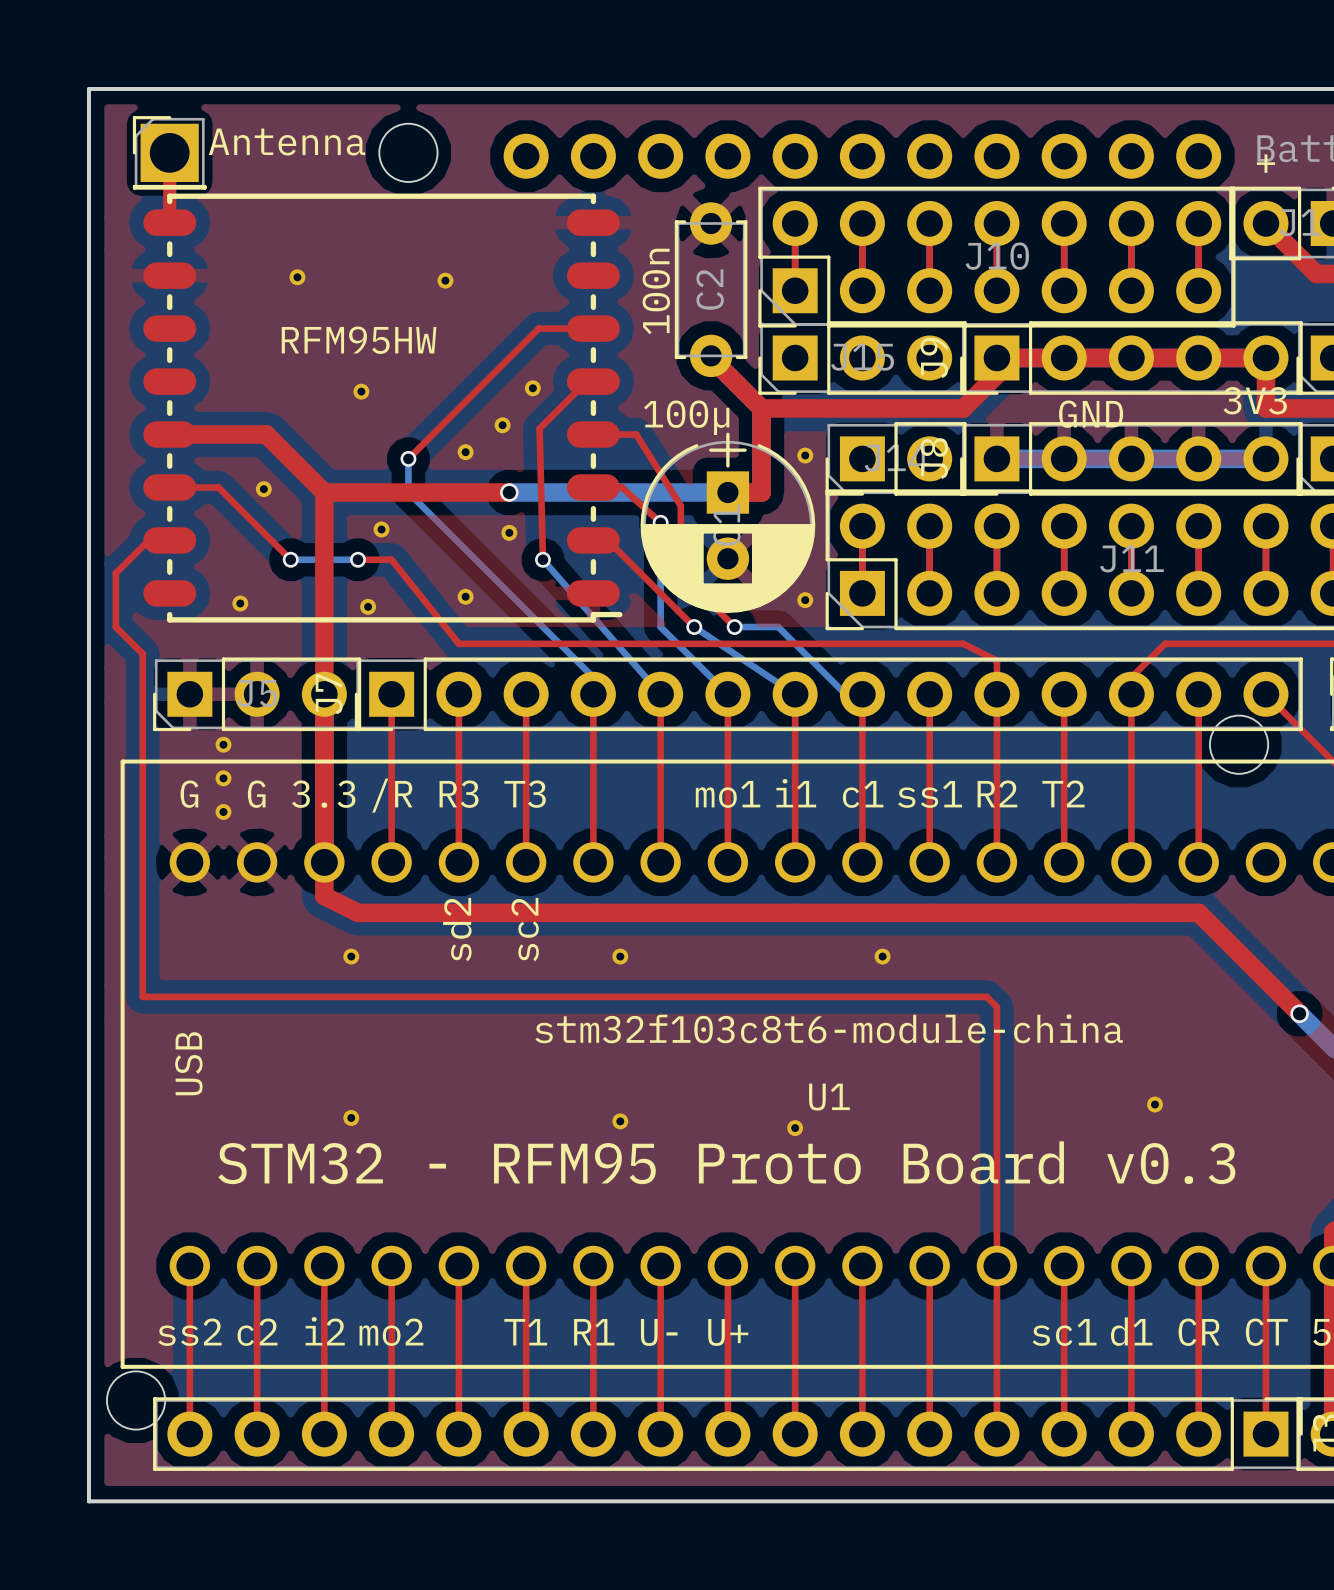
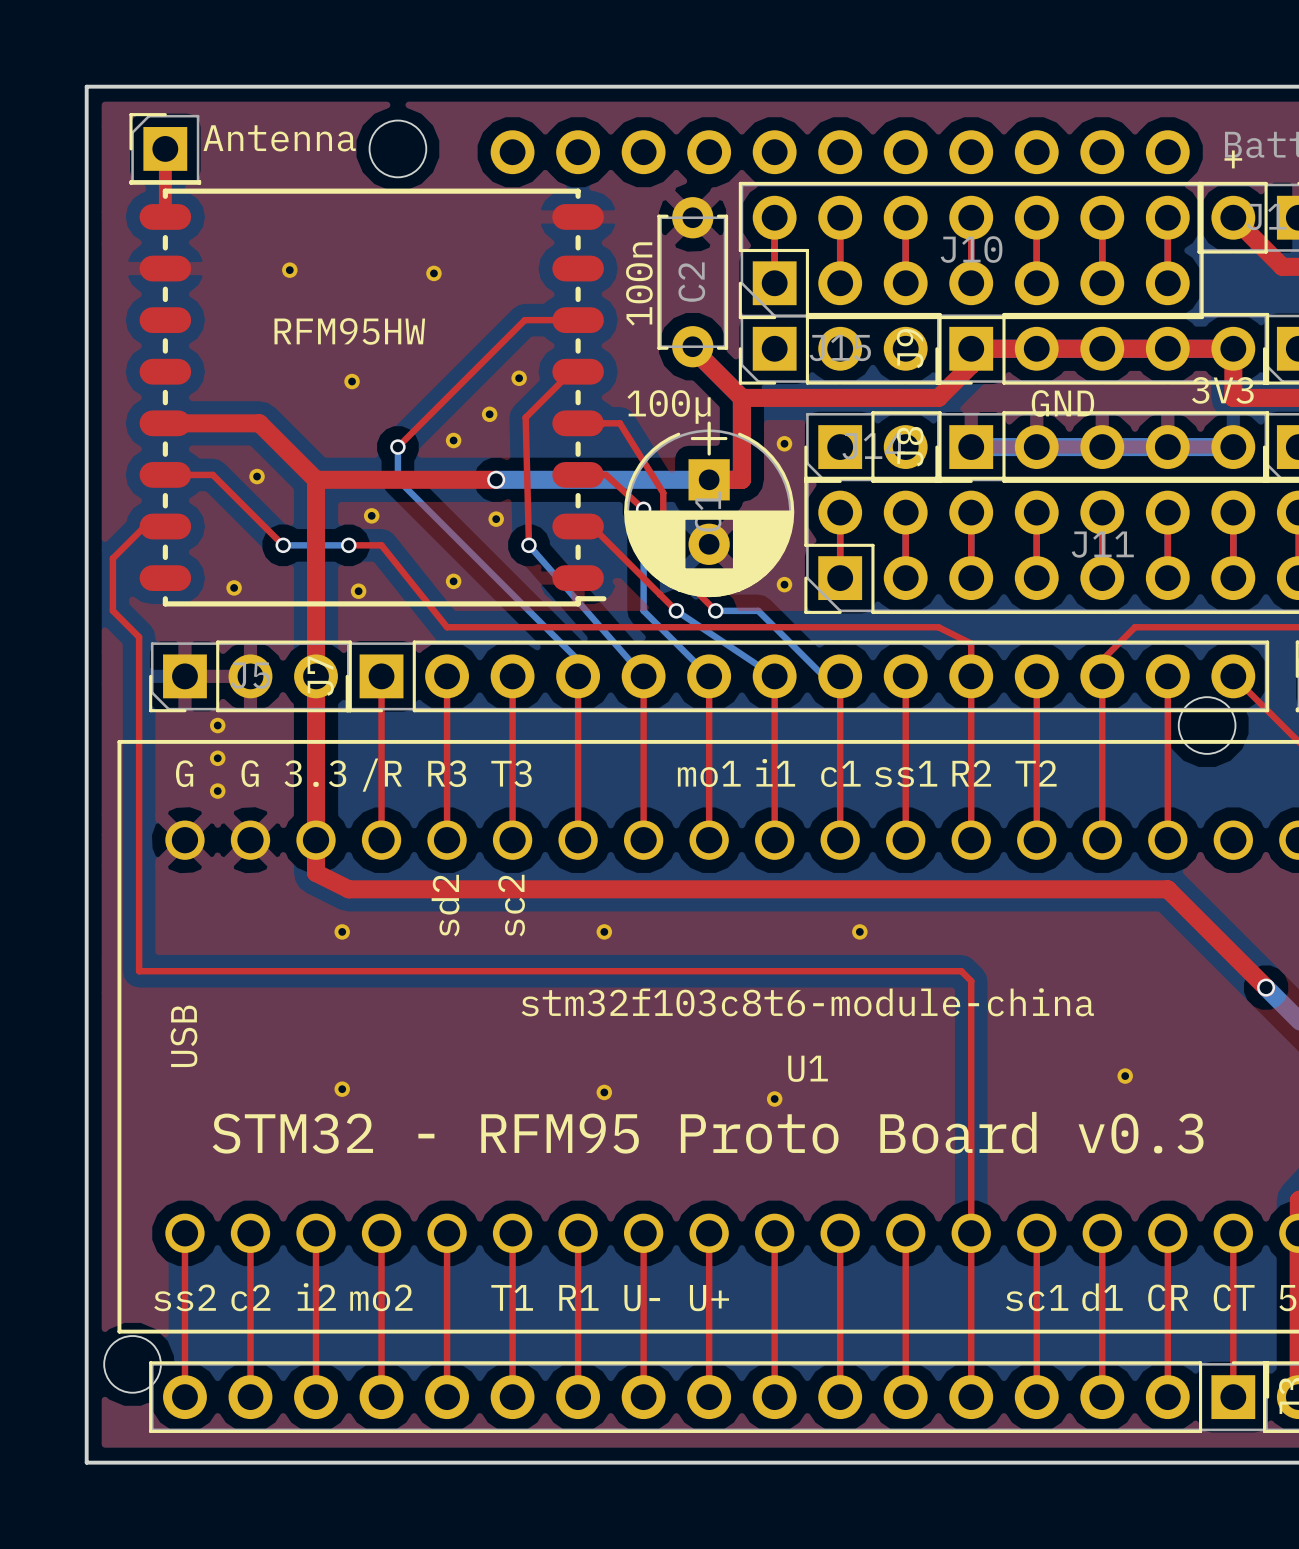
part footprint: [132, 116, 207, 190] -> [129, 113, 202, 185]

